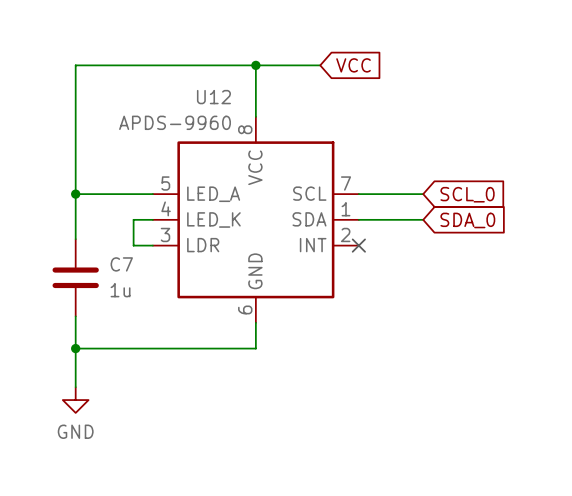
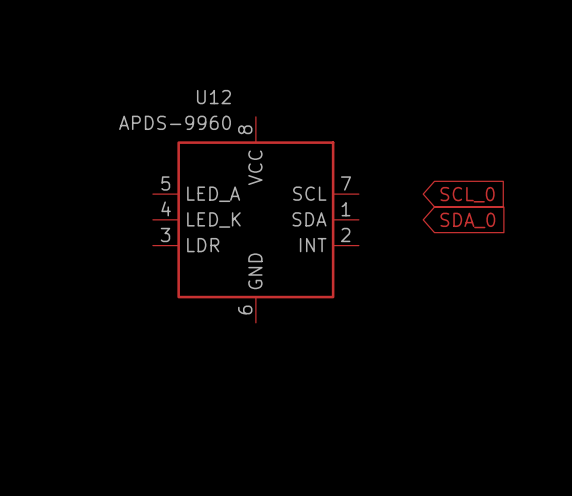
wire: (255, 65) (255, 116) -> none
junction: (255, 65) -> none
wire: (320, 65) (75, 65) (75, 239) -> none
global label: VCC (353, 65) -> none
wire: (75, 194) (152, 194) -> none
junction: (75, 194) -> none
wire: (358, 194) (423, 194) -> none
wire: (152, 219) (133, 219) (133, 245) (152, 245) -> none
wire: (358, 219) (423, 219) -> none
no-connect mark: (358, 245) -> none
C7: 1u (75, 277) -> none
wire: (75, 316) (75, 387) -> none
wire: (255, 322) (255, 348) (75, 348) -> none
junction: (75, 348) -> none
power symbol: GND (75, 400) -> none

